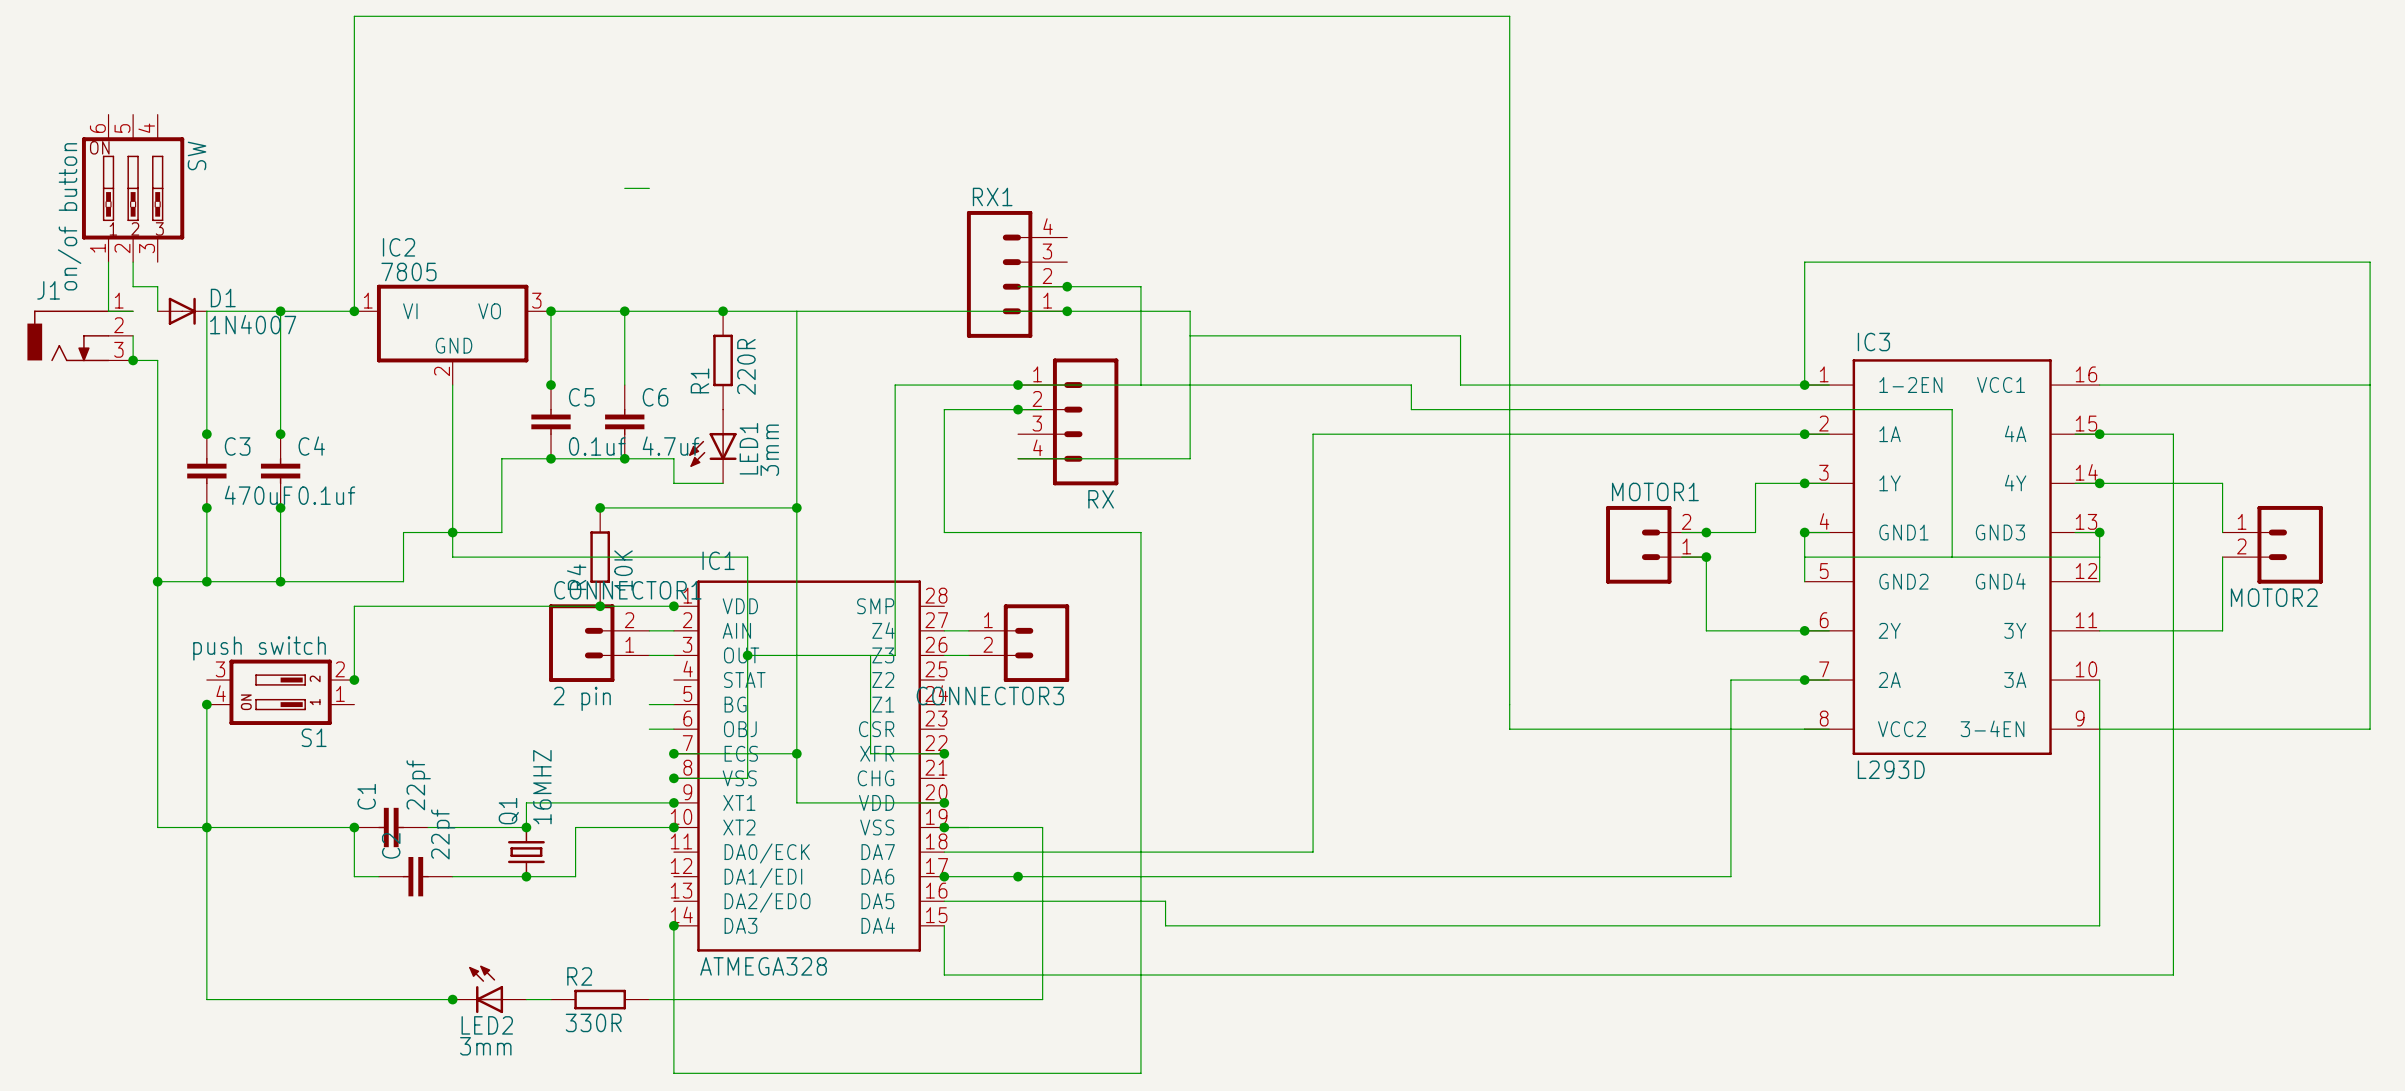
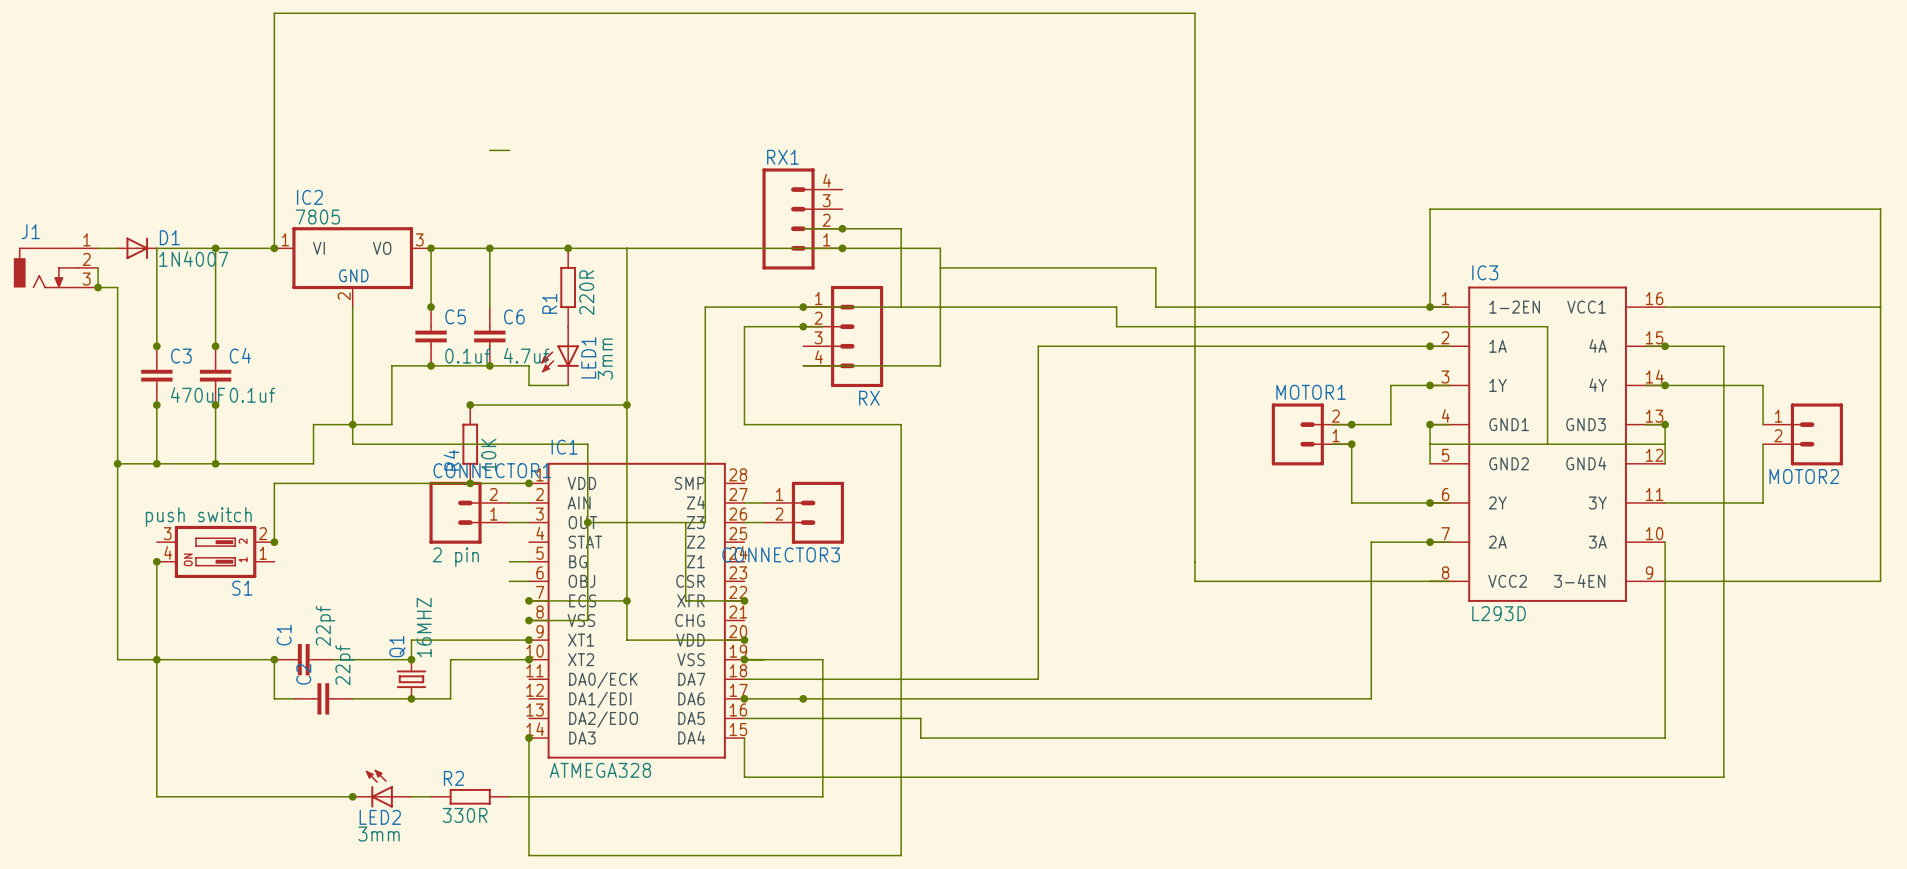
SW: on/of button (133, 188) -> none
wire: (108, 262) (108, 311) (133, 311) -> none
wire: (133, 262) (133, 286) (157, 286) (157, 311) -> (98, 248) (117, 248)

